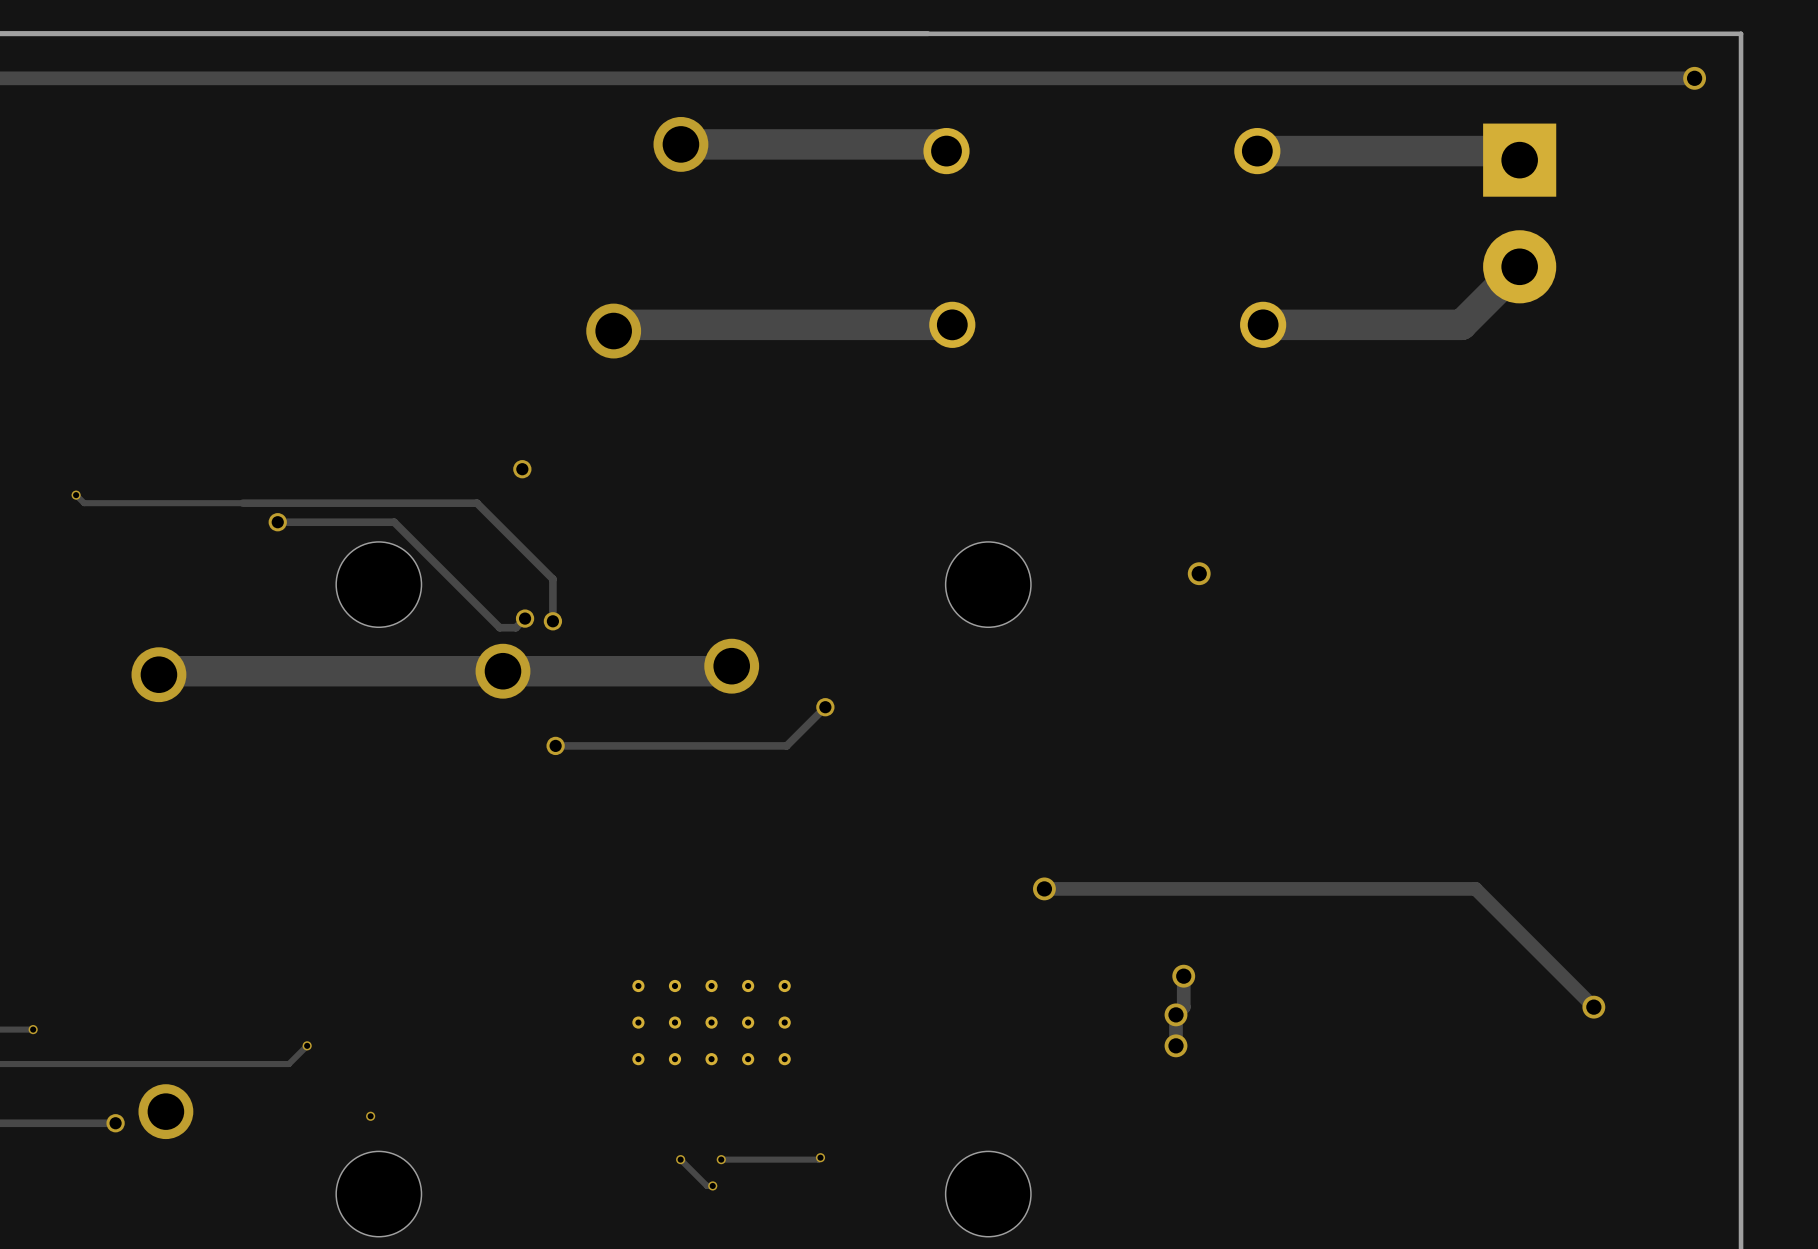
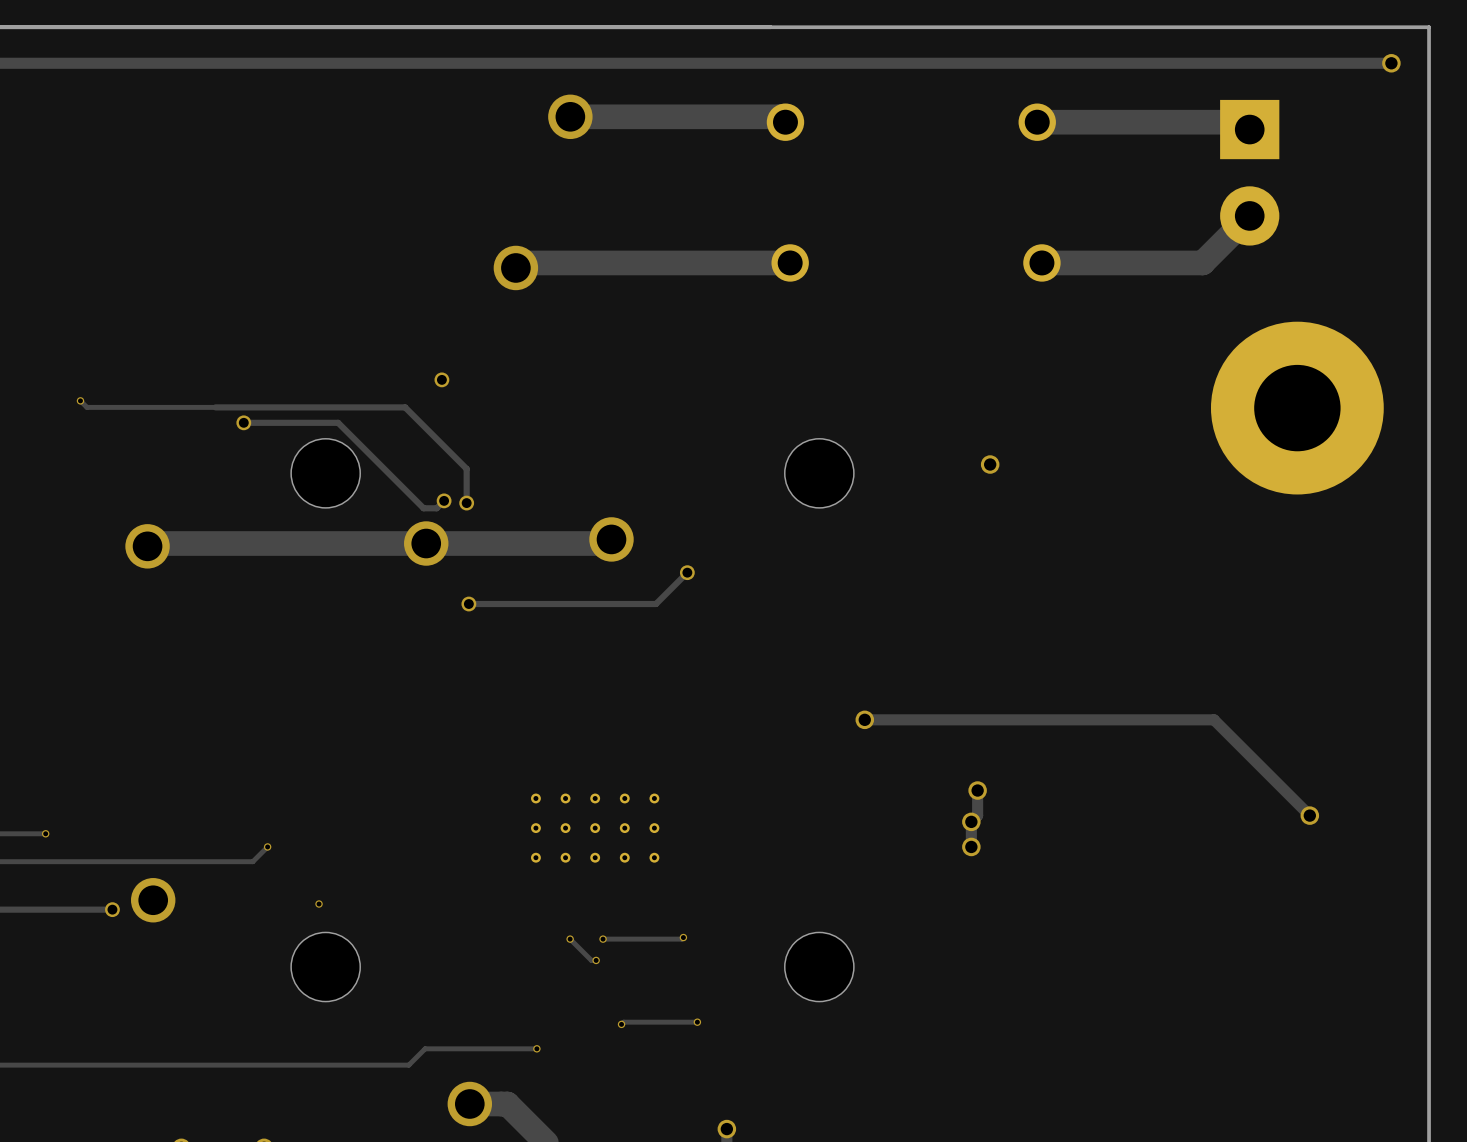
part: none -> (1297, 408)

